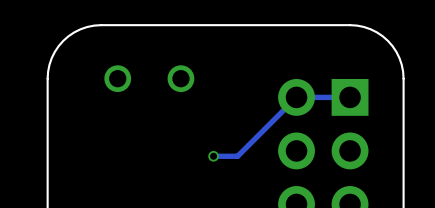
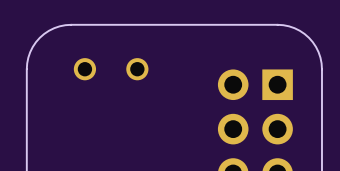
track: (350, 97) (296, 97) (237, 156) (213, 156) -> none
via: (213, 156) -> none

